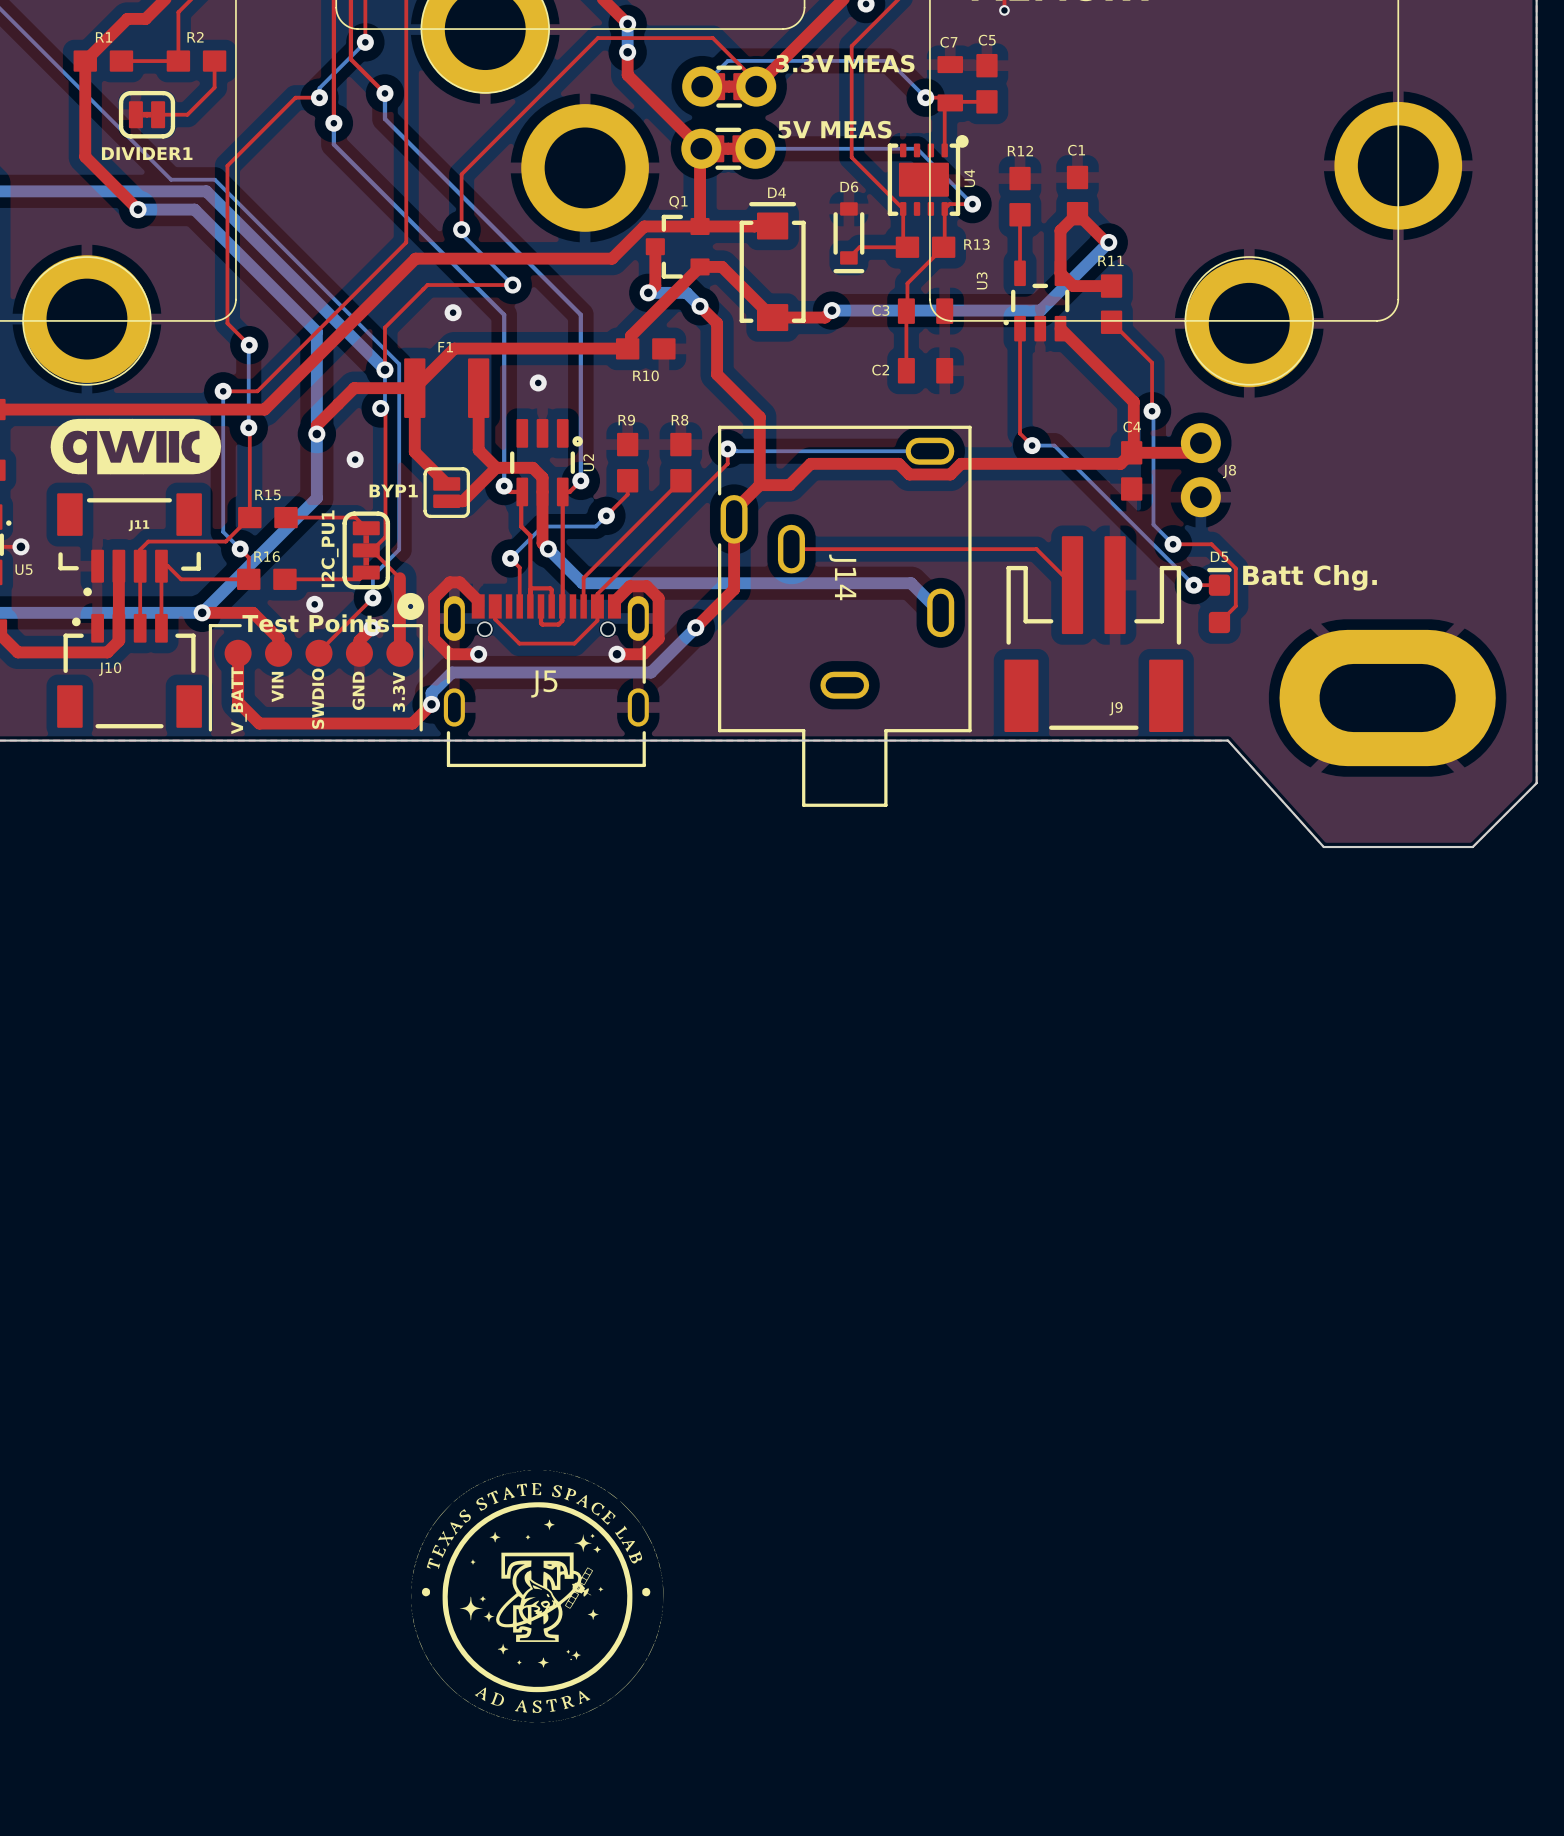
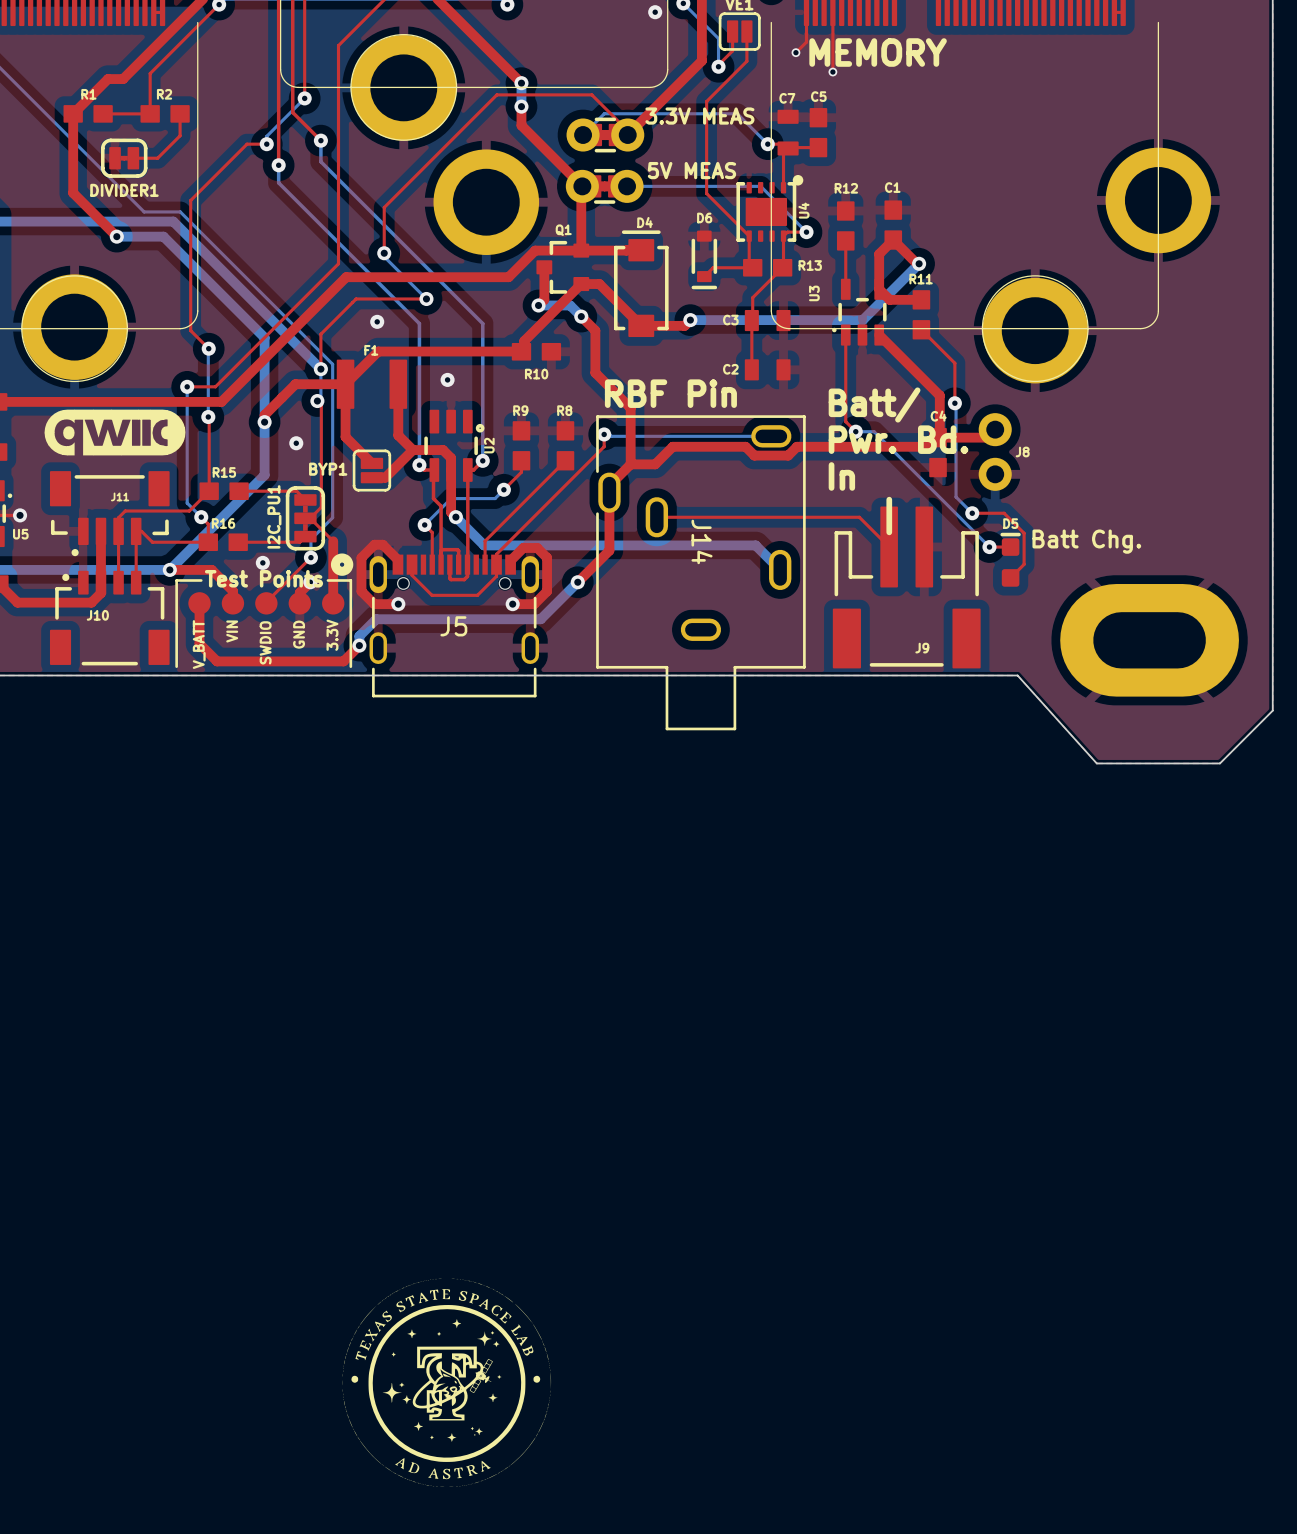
text: none -> RBF Pin (670, 393)
text: none -> Batt/ (874, 405)
text: none -> Pwr. Bd. (898, 439)
text: none -> In (841, 476)
text: none -> | (889, 516)

